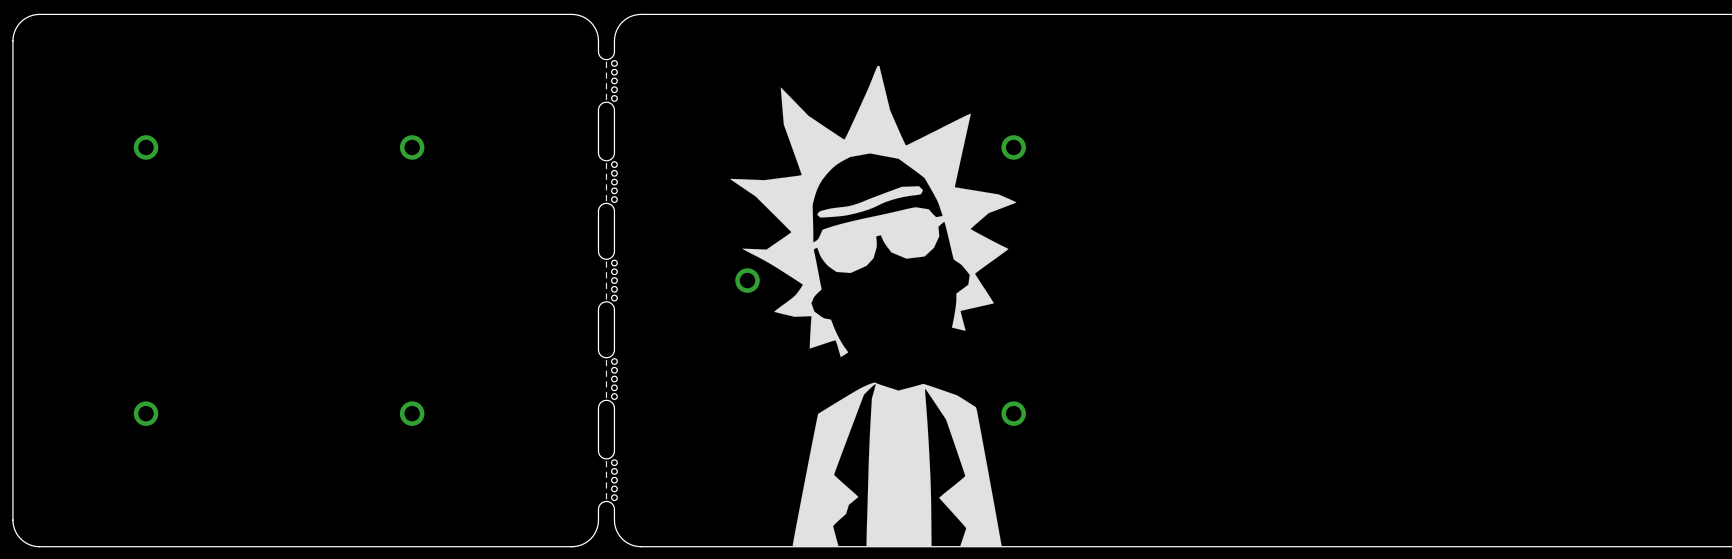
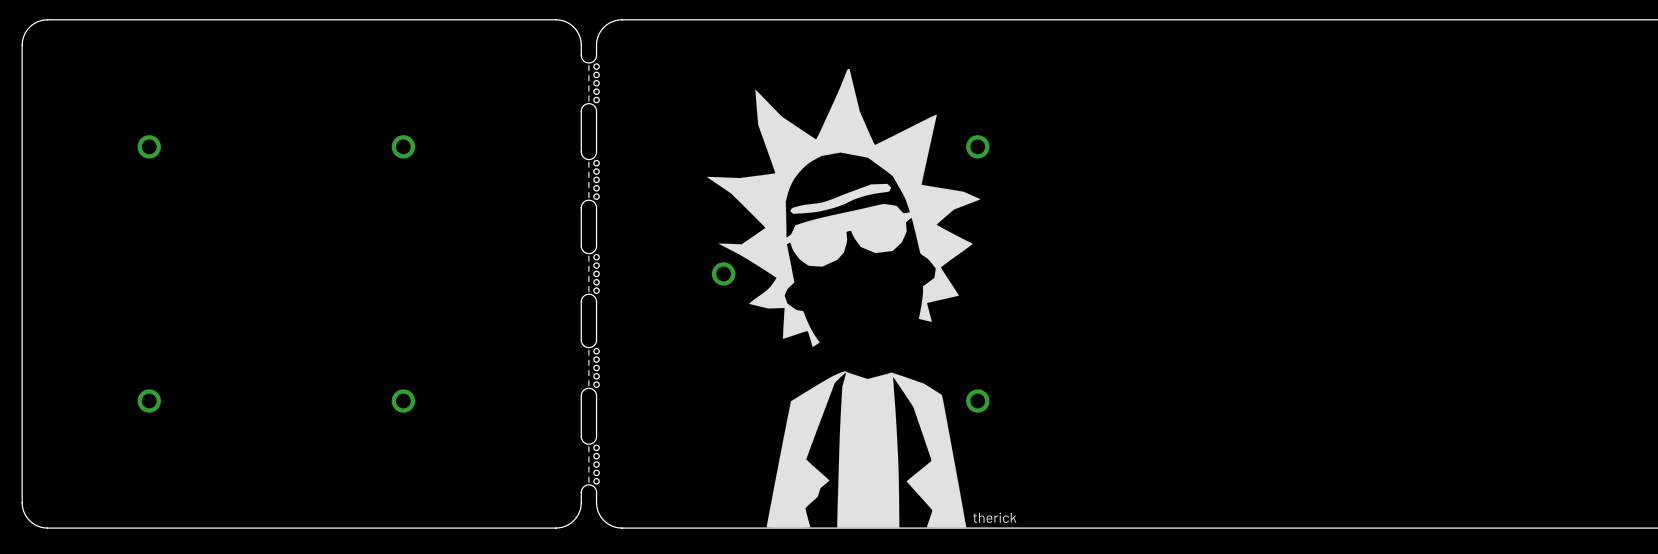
text: none -> therick (994, 517)

